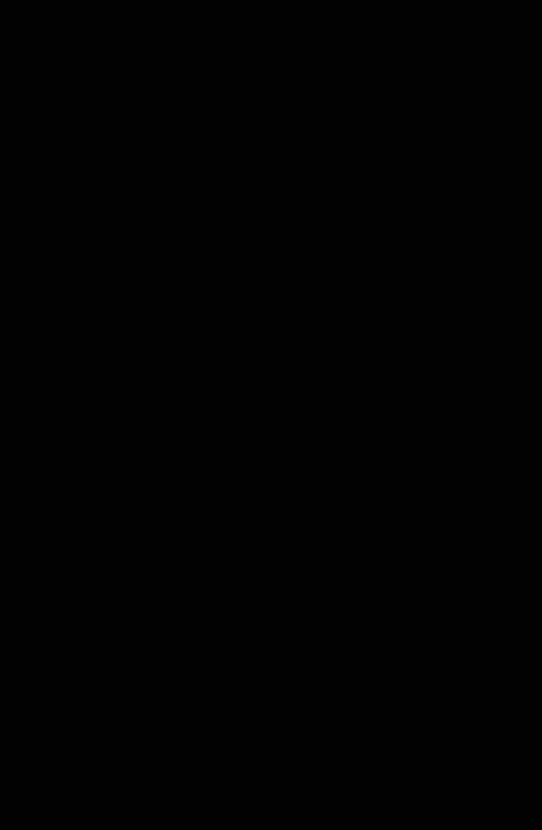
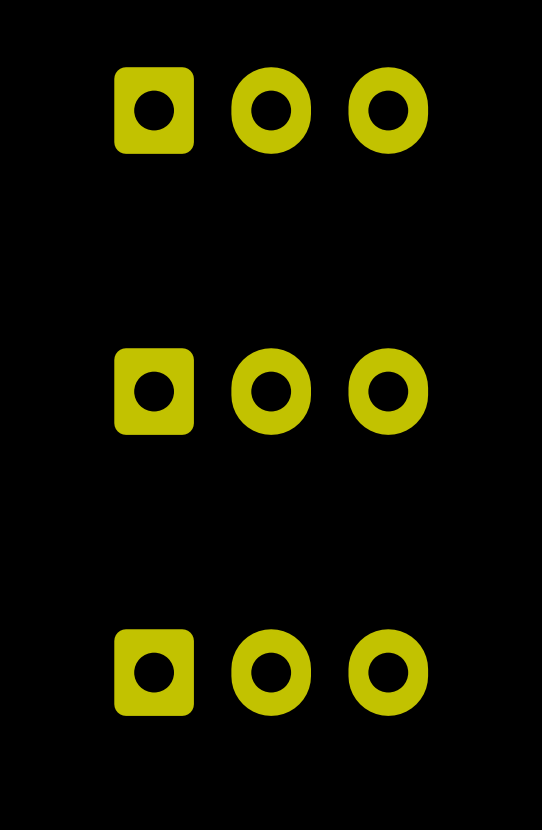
part: none -> (271, 110)
part: none -> (271, 391)
part: none -> (271, 672)

